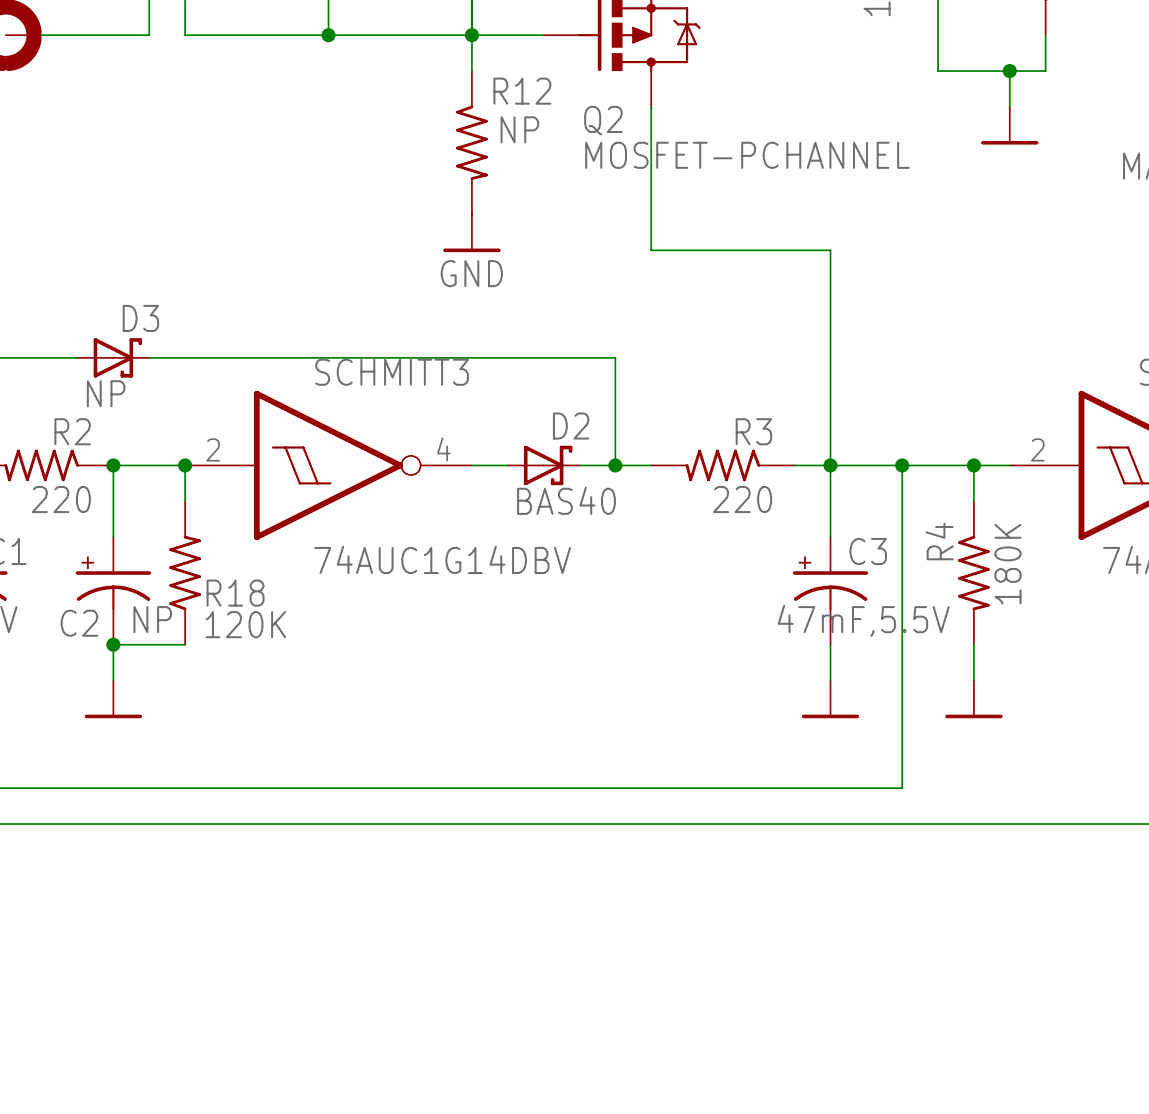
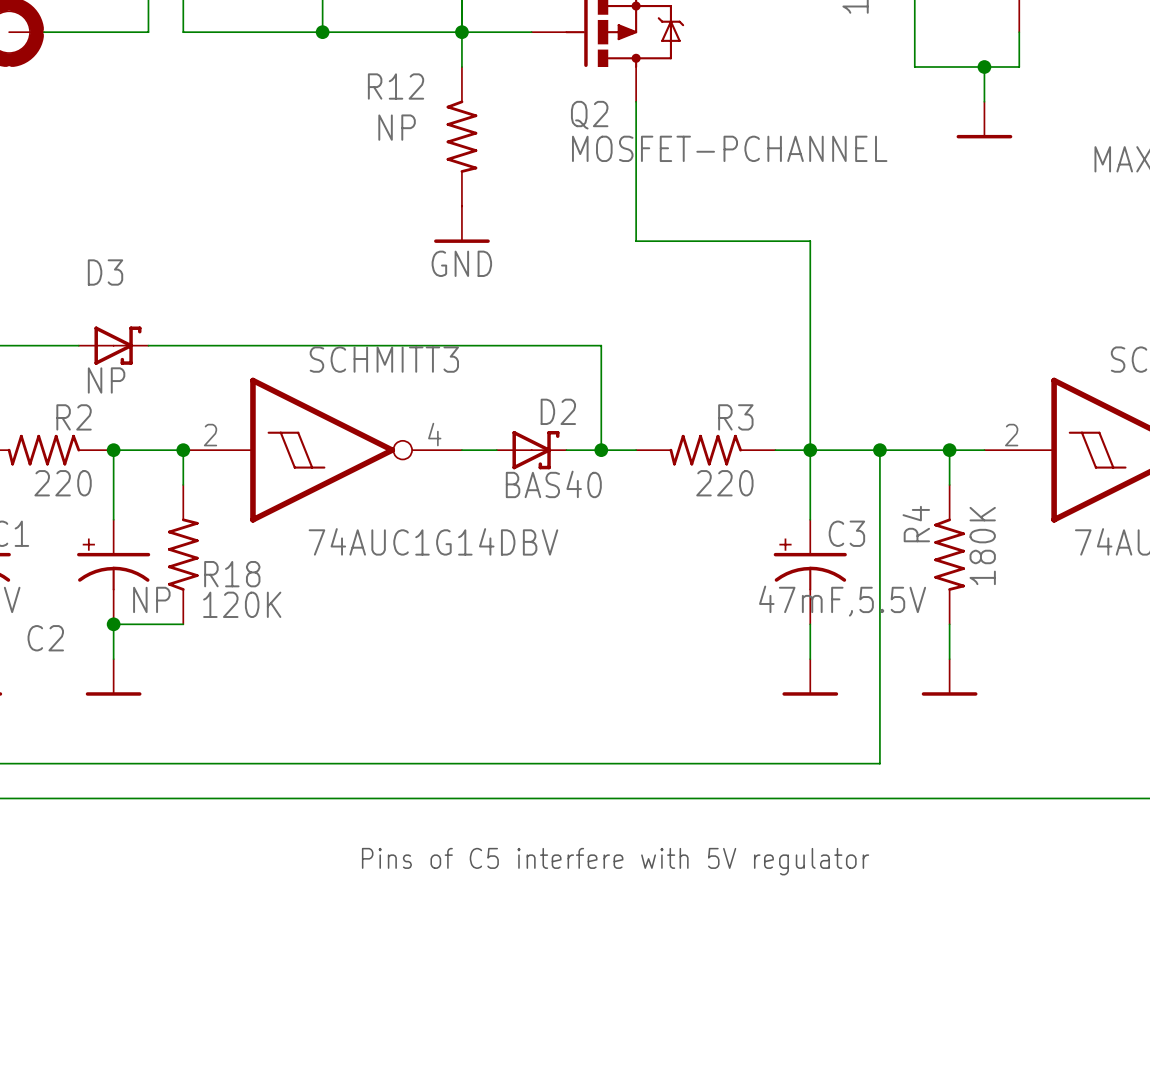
R12 name position: R12 (522, 91) -> R12 (396, 86)
R12 value position: NP (519, 129) -> NP (397, 127)
D3 name position: D3 (140, 318) -> D3 (105, 272)
C2 name position: C2 (79, 623) -> C2 (45, 638)
text: none -> Pins of C5 interfere with 5V regulator (615, 861)

